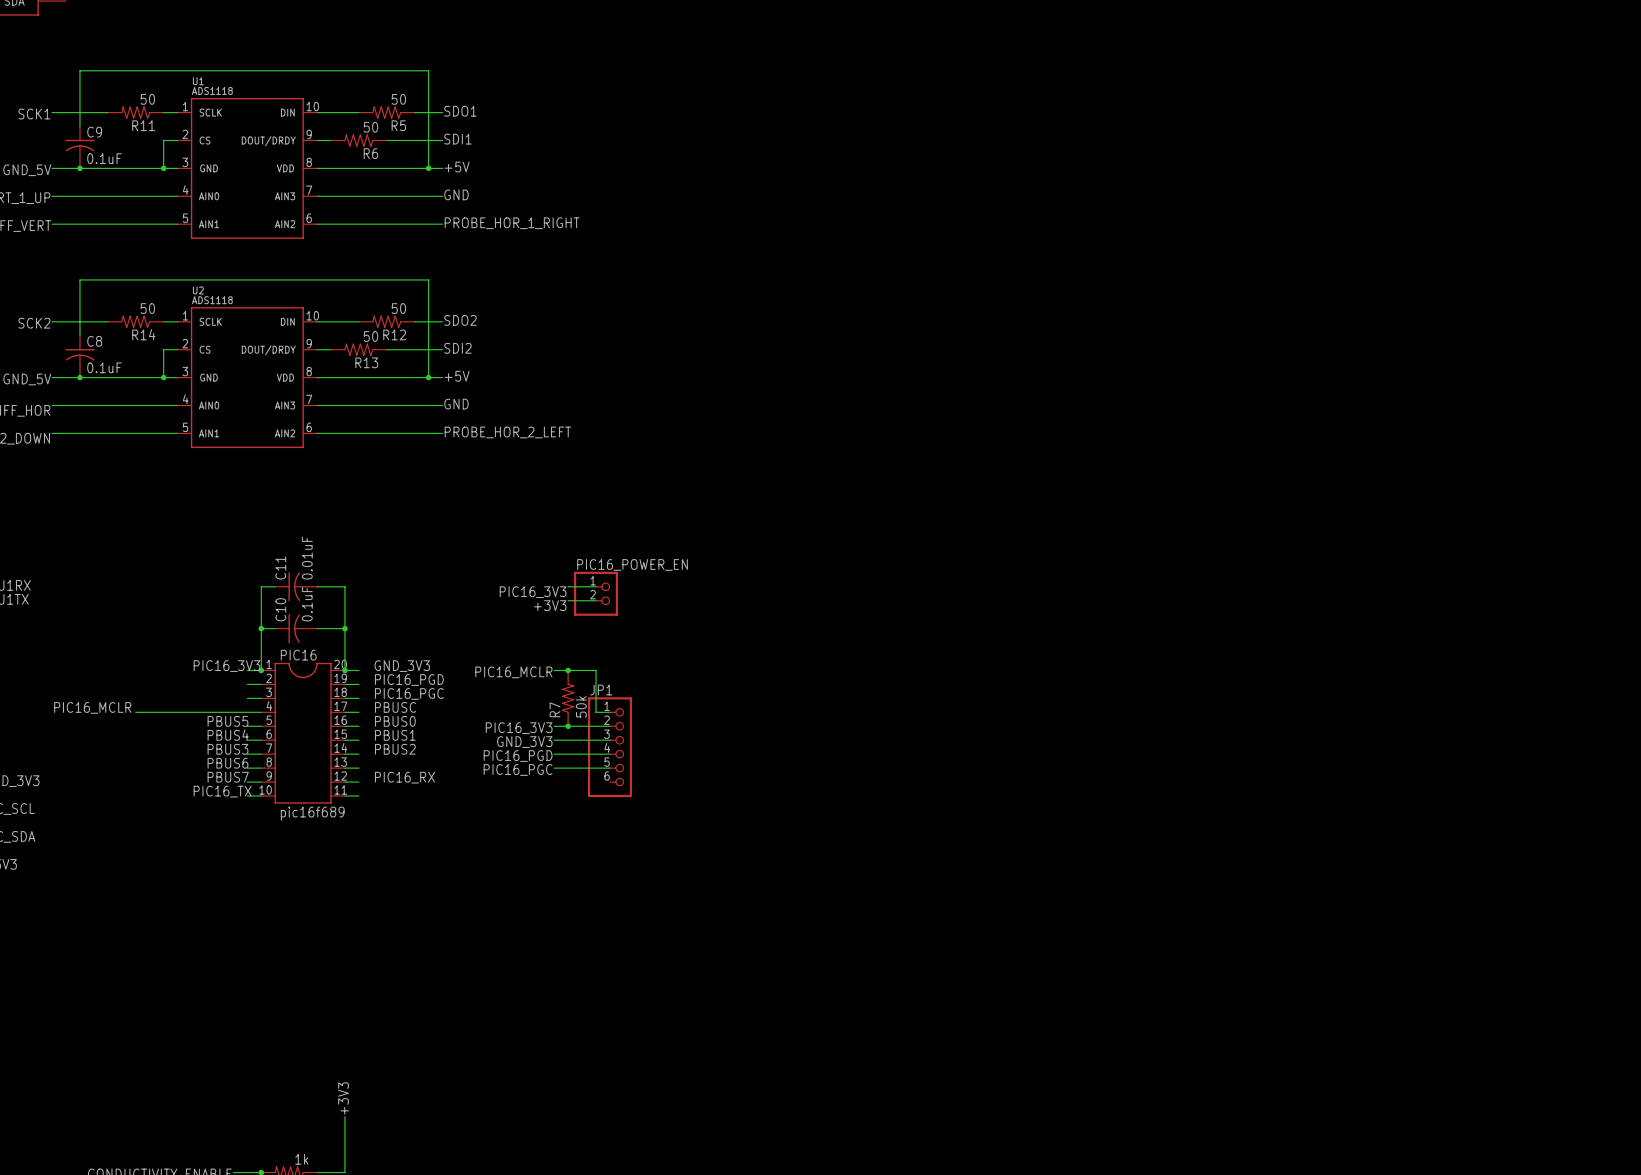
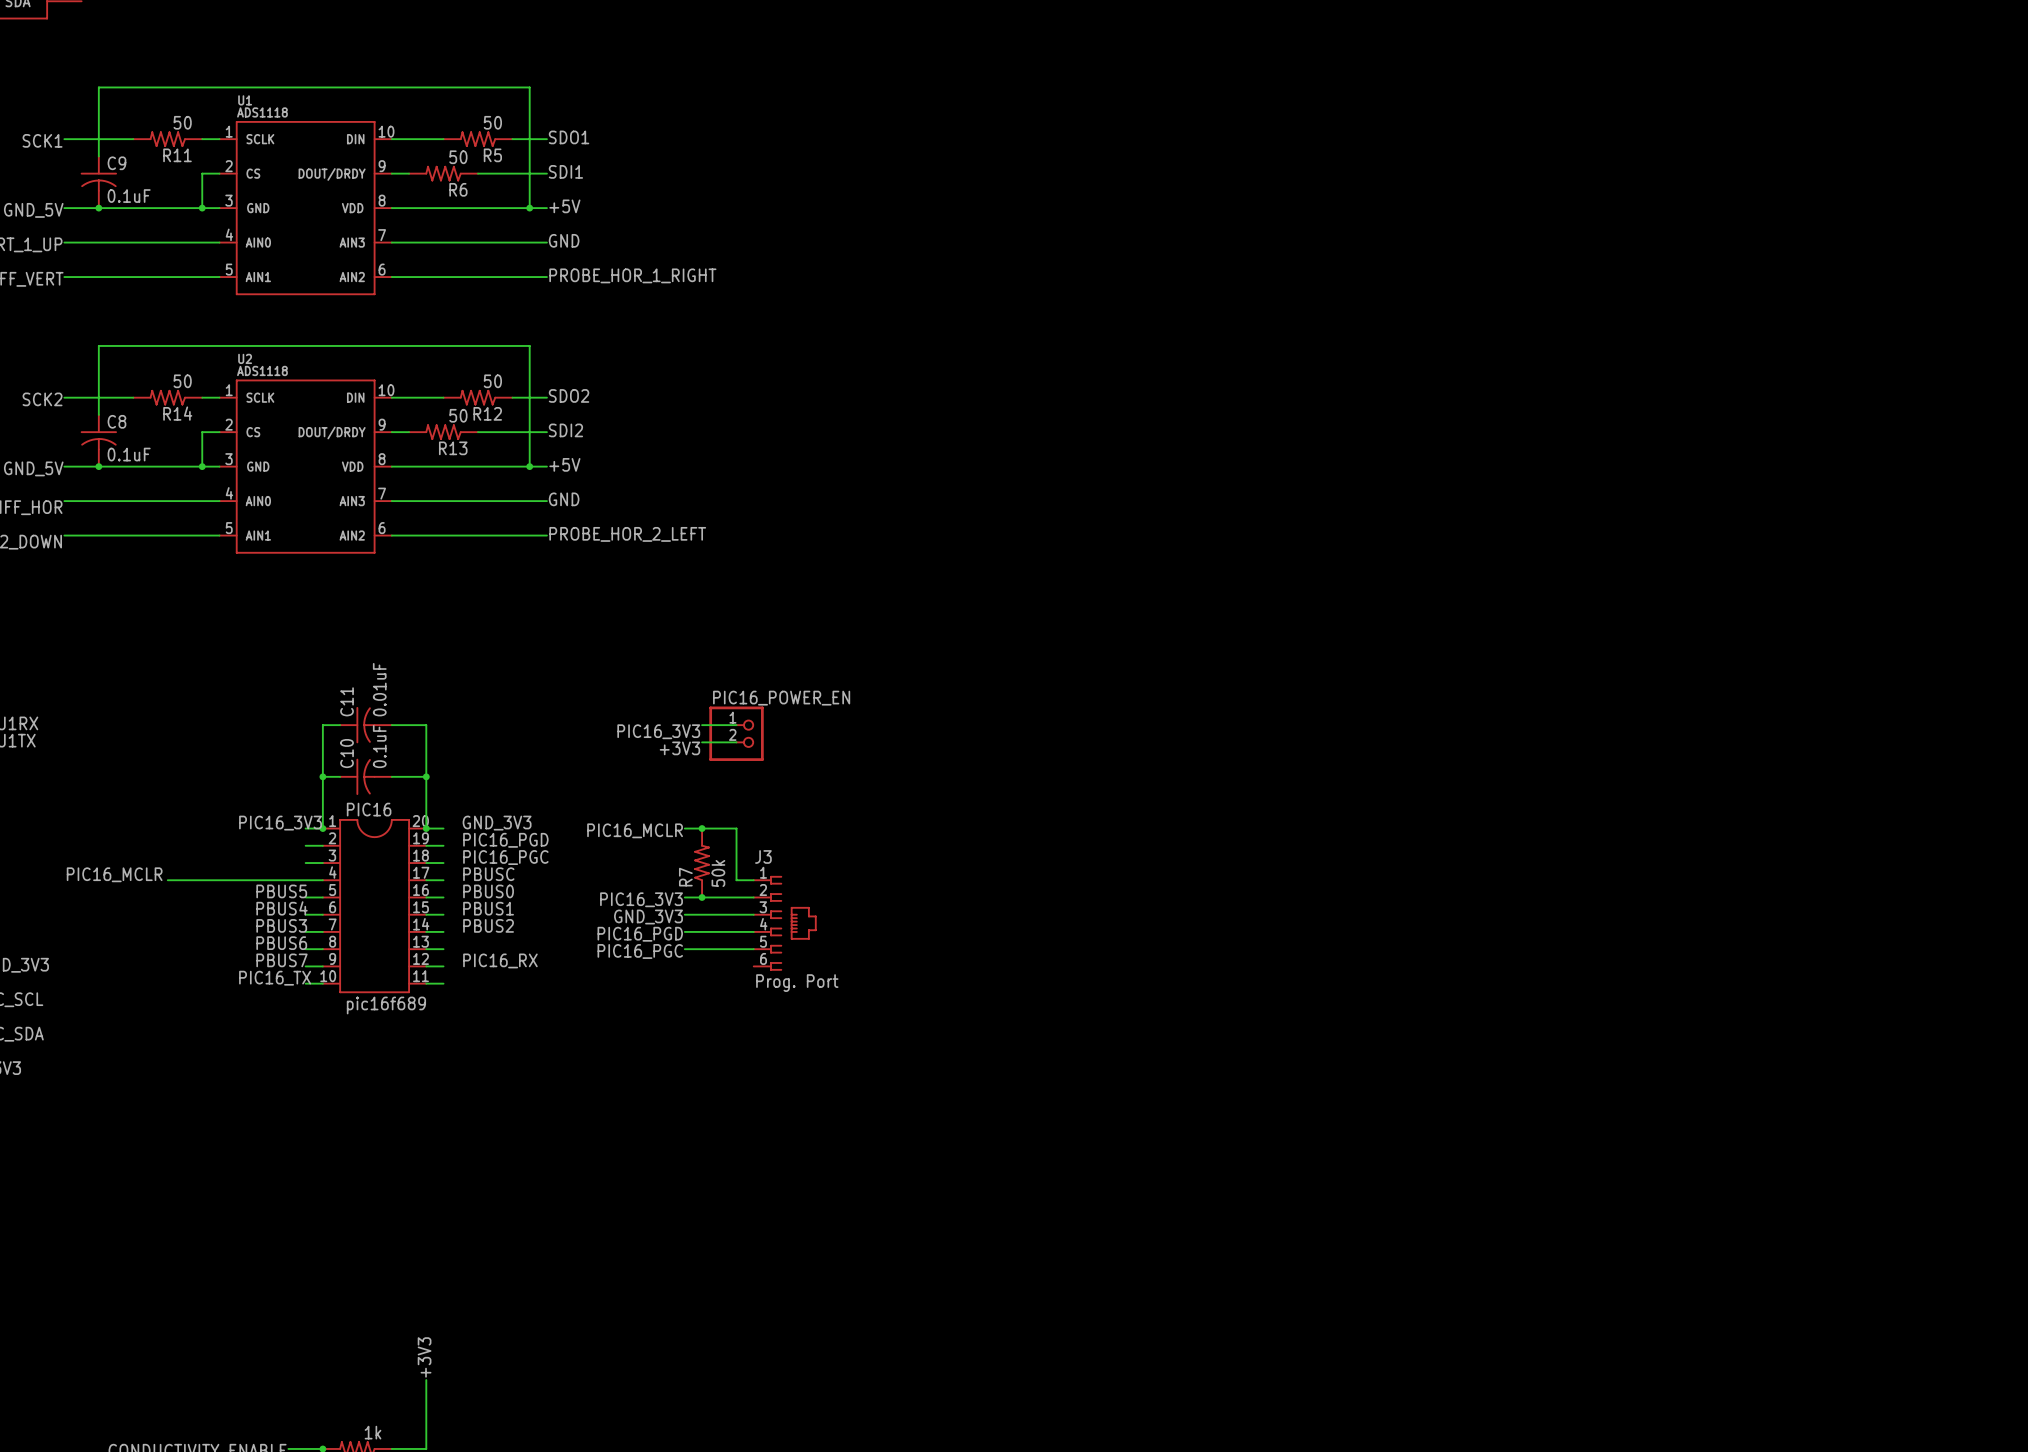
JP1: (609, 747) -> none
J3: none -> Prog. Port (785, 923)

